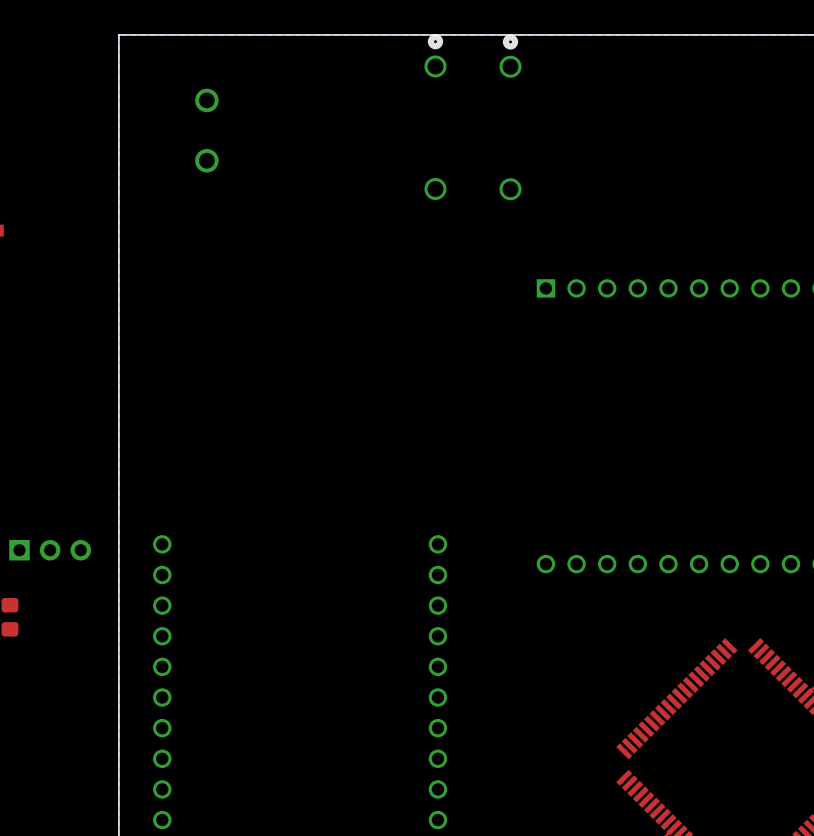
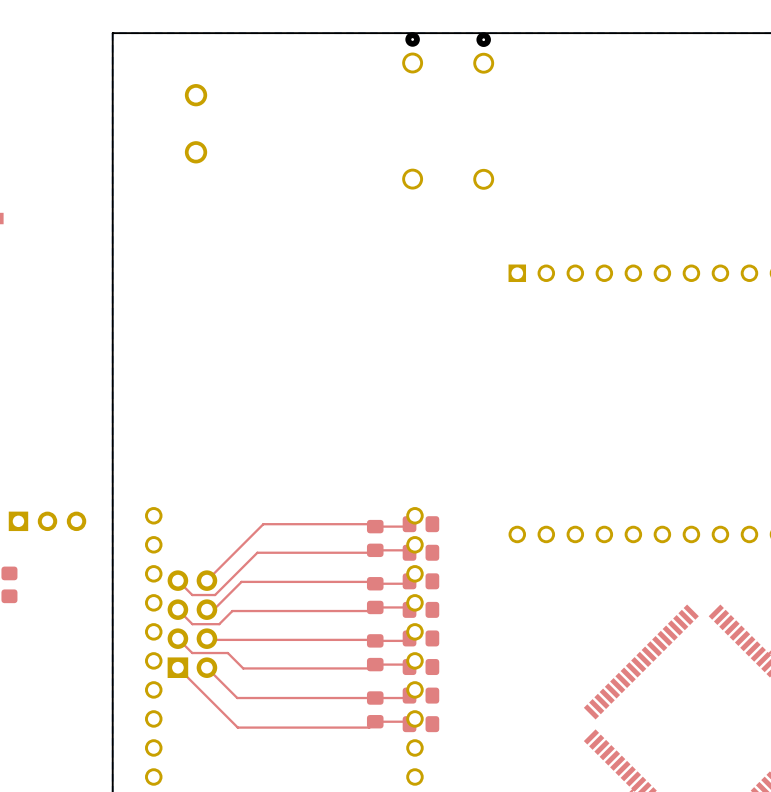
top track: none -> (409, 524) (407, 526) (375, 526) (372, 524) (263, 524) (206, 580)
part: none -> (420, 524)
part: none -> (375, 538)
top track: none -> (409, 552) (407, 550) (375, 550) (372, 552) (257, 552) (215, 595) (192, 595) (177, 580)
part: none -> (420, 552)
top track: none -> (409, 581) (407, 583) (241, 581) (213, 609) (206, 609)
part: none -> (420, 581)
part: none -> (375, 595)
top track: none -> (177, 609) (192, 624) (219, 624) (232, 611) (371, 611) (375, 607) (407, 607) (409, 609)
part: none -> (420, 609)
part: none -> (192, 624)
top track: none -> (409, 638) (407, 640) (206, 638)
part: none -> (420, 638)
top track: none -> (177, 638) (192, 653) (227, 653) (243, 668) (371, 668) (375, 664) (407, 664) (409, 667)
part: none -> (375, 652)
part: none -> (420, 667)
top track: none -> (177, 667) (237, 727) (369, 727) (375, 721) (407, 721) (409, 724)
top track: none -> (206, 667) (237, 698) (407, 698) (409, 695)
part: none -> (420, 695)
part: none -> (375, 709)
part: none -> (420, 724)

